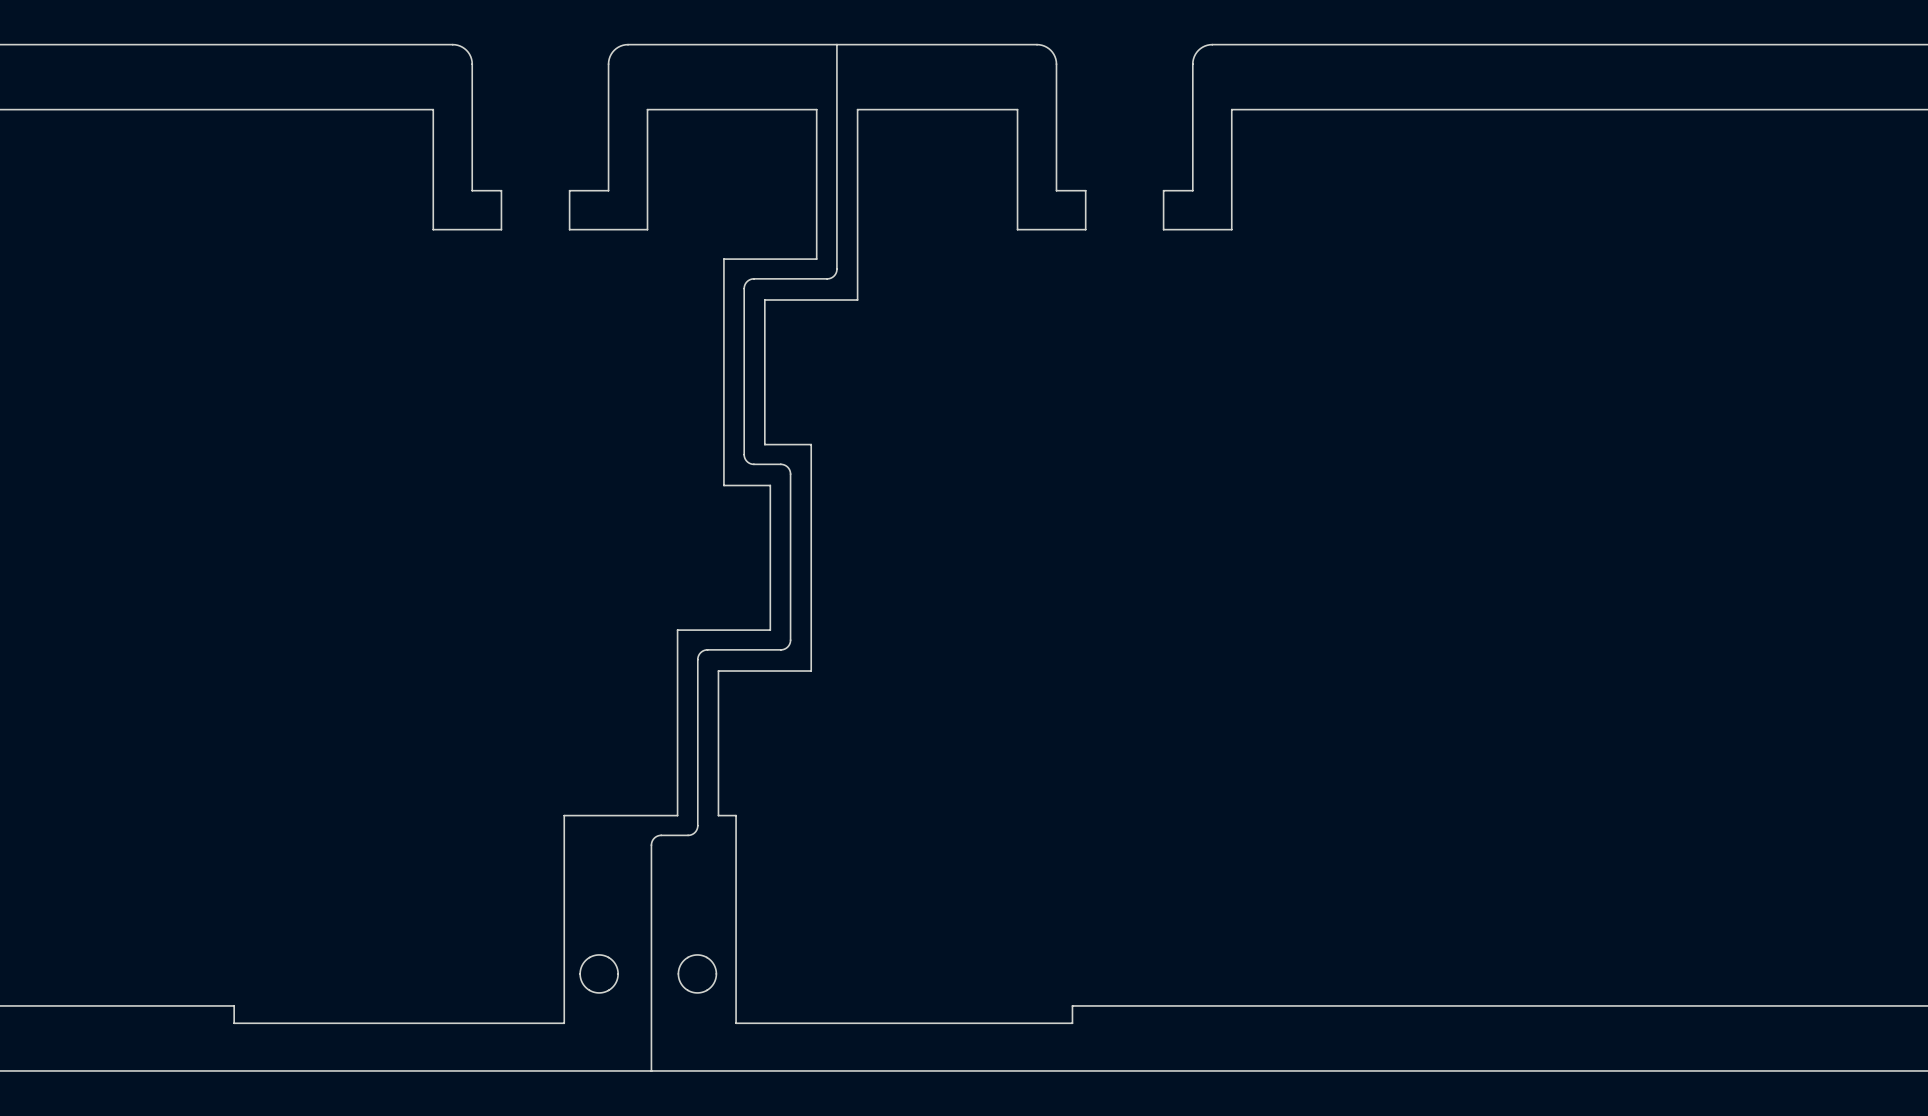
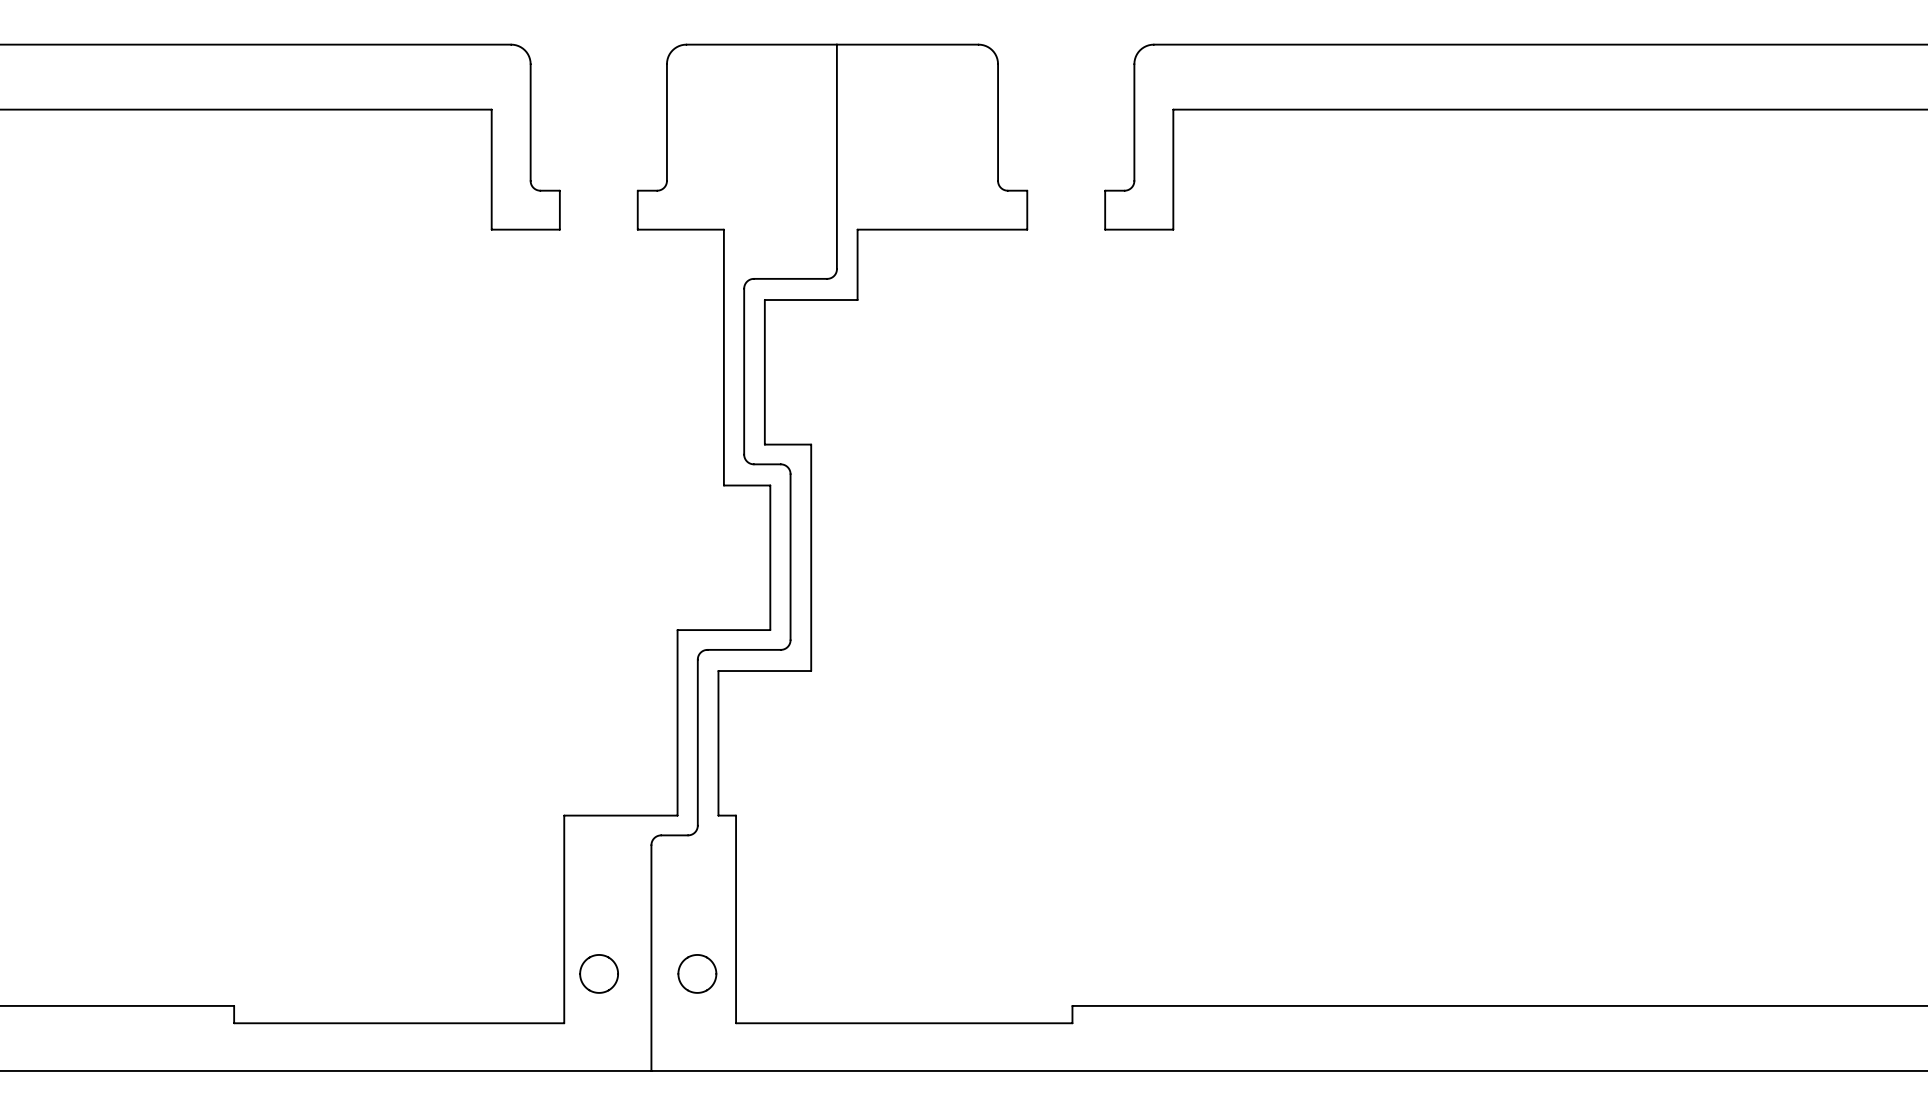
board edge: (452, 44) (464, 48) (472, 61) (472, 190) (501, 190) (501, 229) -> (452, 44) (513, 44) (523, 48) (529, 59) (530, 182) (533, 187) (537, 190) (559, 190) (559, 229) (501, 229)
board edge: (686, 44) (625, 44) (612, 52) (608, 64) (608, 190) (569, 190) (569, 229) (637, 229) -> (686, 44) (672, 50) (667, 61) (666, 183) (659, 190) (637, 190) (637, 229)
board edge: (978, 44) (1039, 44) (1050, 50) (1055, 59) (1056, 190) (1085, 190) (1085, 229) (1027, 229) -> (978, 44) (992, 50) (997, 61) (998, 183) (1005, 190) (1027, 190) (1027, 229)
board edge: (1212, 44) (1198, 50) (1192, 61) (1192, 190) (1163, 190) (1163, 229) -> (1212, 44) (1151, 44) (1140, 50) (1135, 59) (1134, 182) (1132, 186) (1127, 190) (1105, 190) (1105, 229) (1163, 229)
board edge: (433, 109) (433, 229) (491, 229) -> (433, 109) (491, 109) (491, 229)
board edge: (1231, 109) (1231, 229) (1173, 229) -> (1231, 109) (1173, 109) (1173, 229)
board edge: (647, 229) (647, 109) (816, 109) (816, 259) (723, 259) -> (647, 229) (723, 229) (723, 259)
board edge: (857, 229) (857, 109) (1017, 109) (1017, 229) -> (857, 229) (1017, 229)

